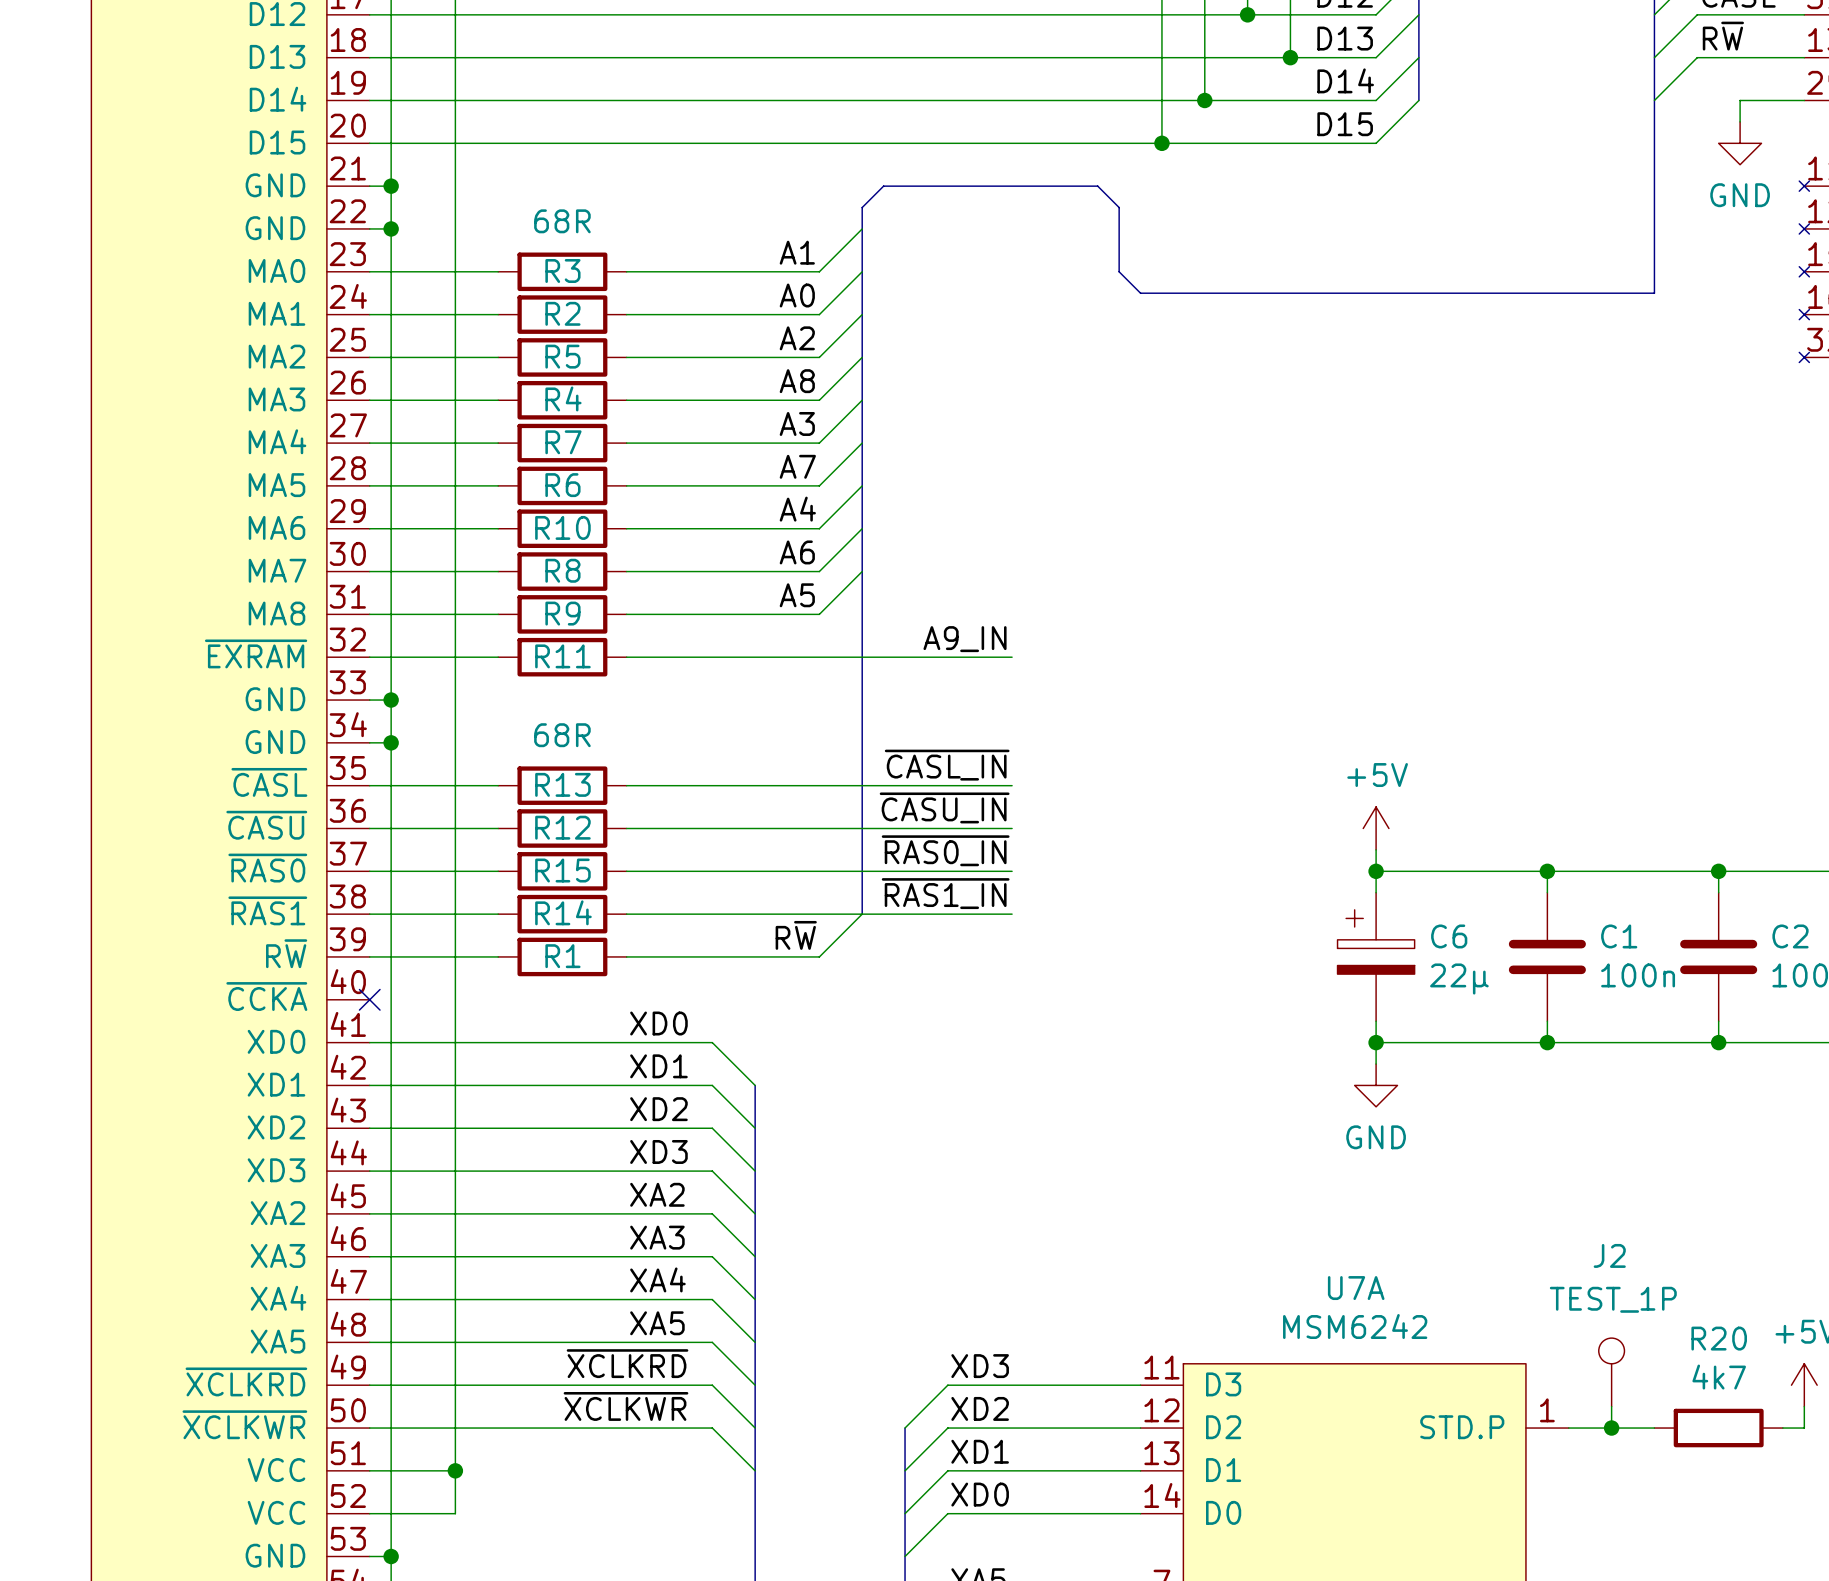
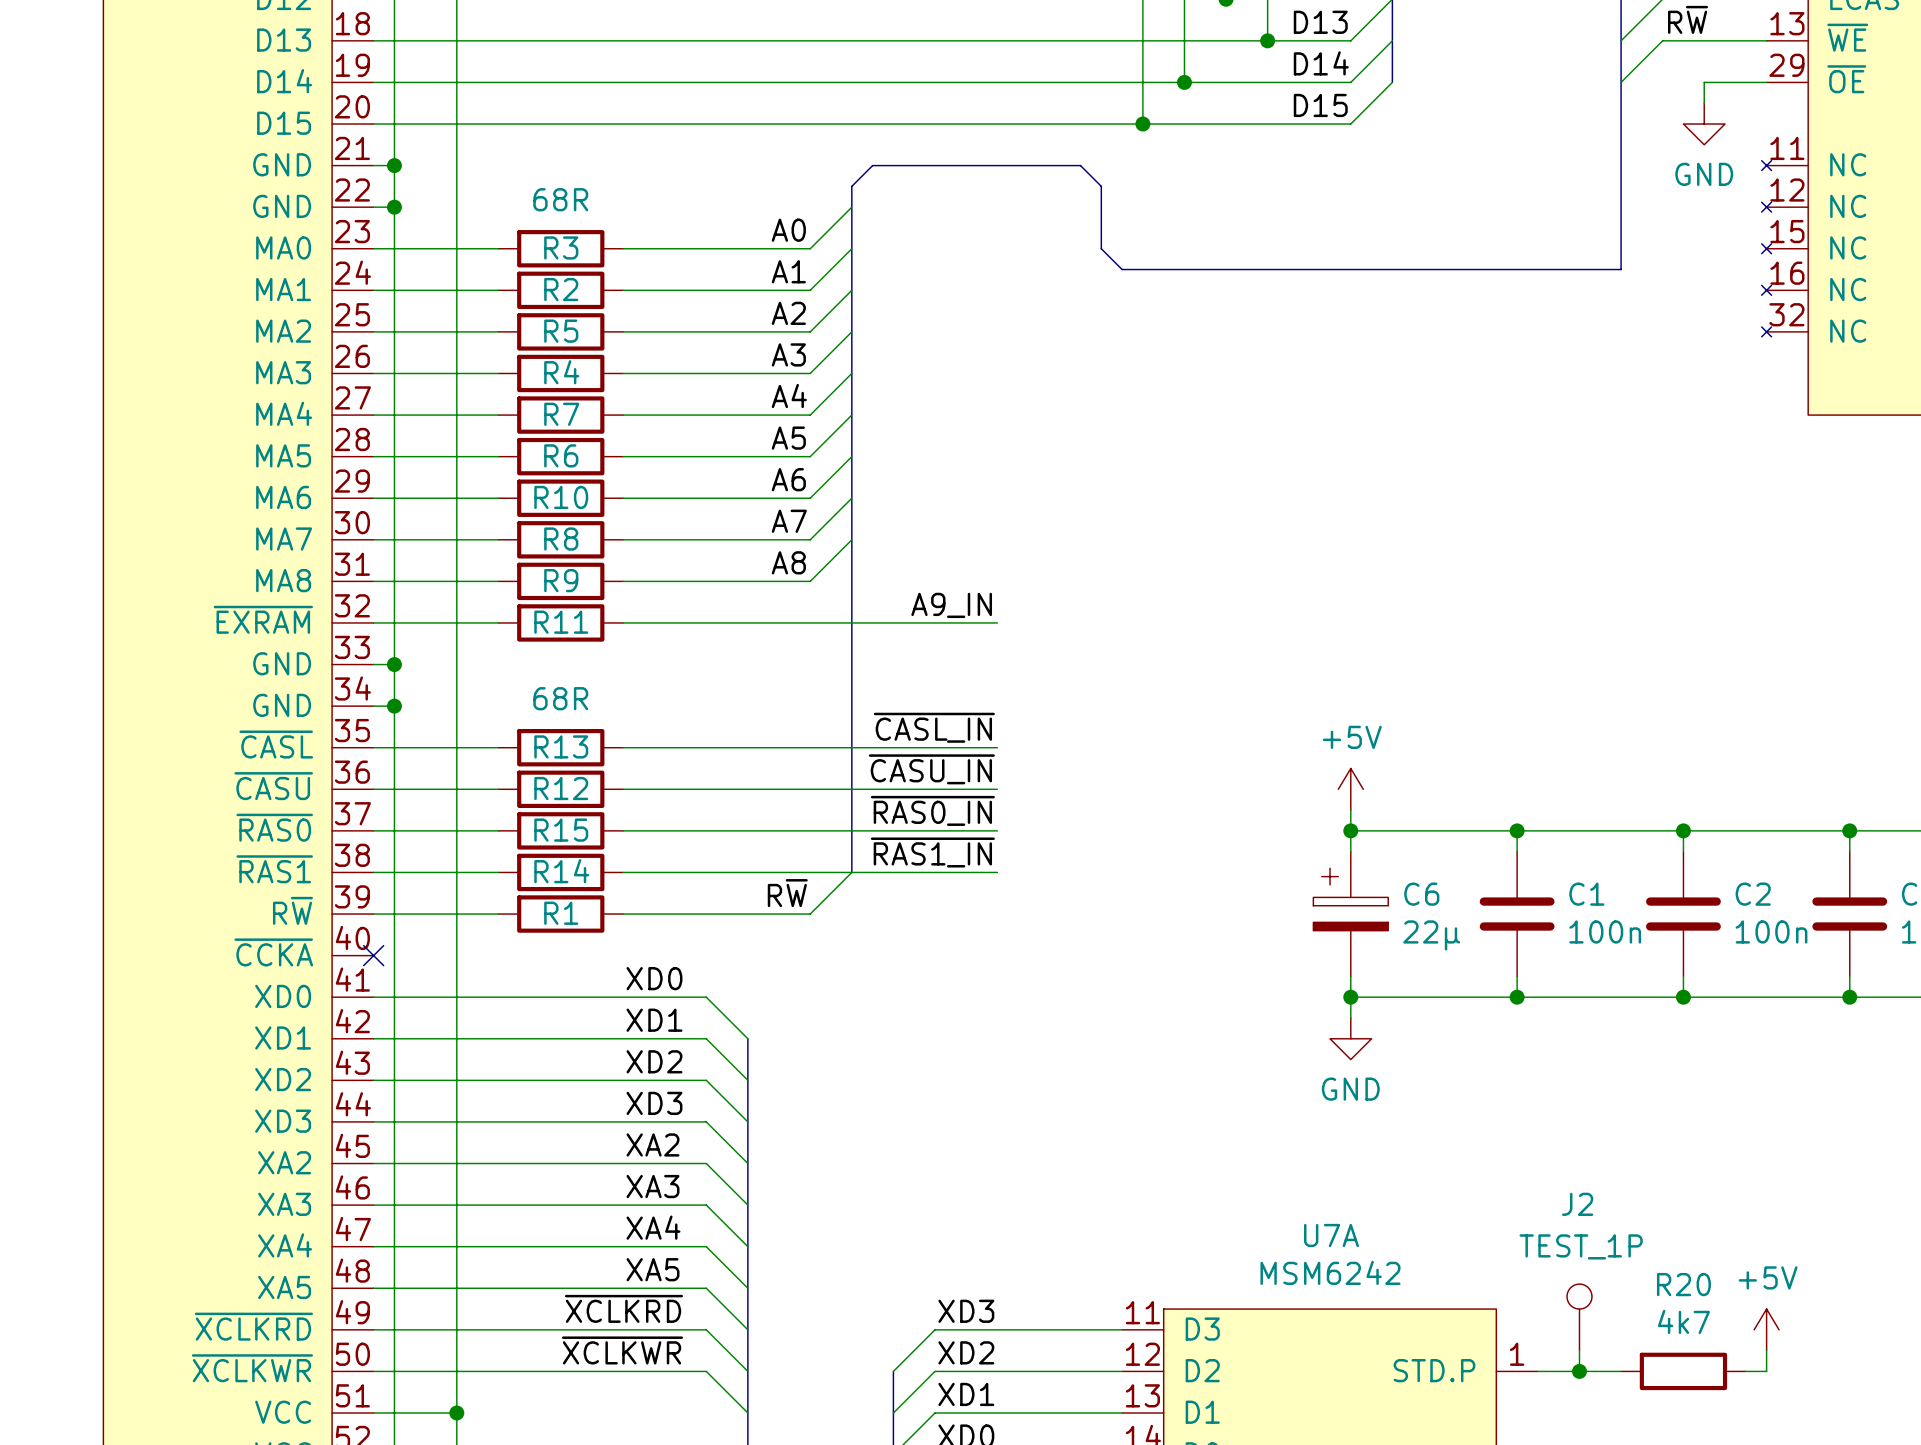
label: A1 (797, 252) -> A0 (788, 230)
label: A0 (797, 295) -> A1 (788, 271)
label: A8 (797, 381) -> A3 (788, 354)
label: A3 (797, 423) -> A4 (789, 396)
label: A7 (797, 466) -> A5 (788, 438)
label: A4 (797, 509) -> A6 (788, 479)
label: A6 (797, 552) -> A7 (789, 521)
label: A5 (797, 595) -> A8 (788, 562)

